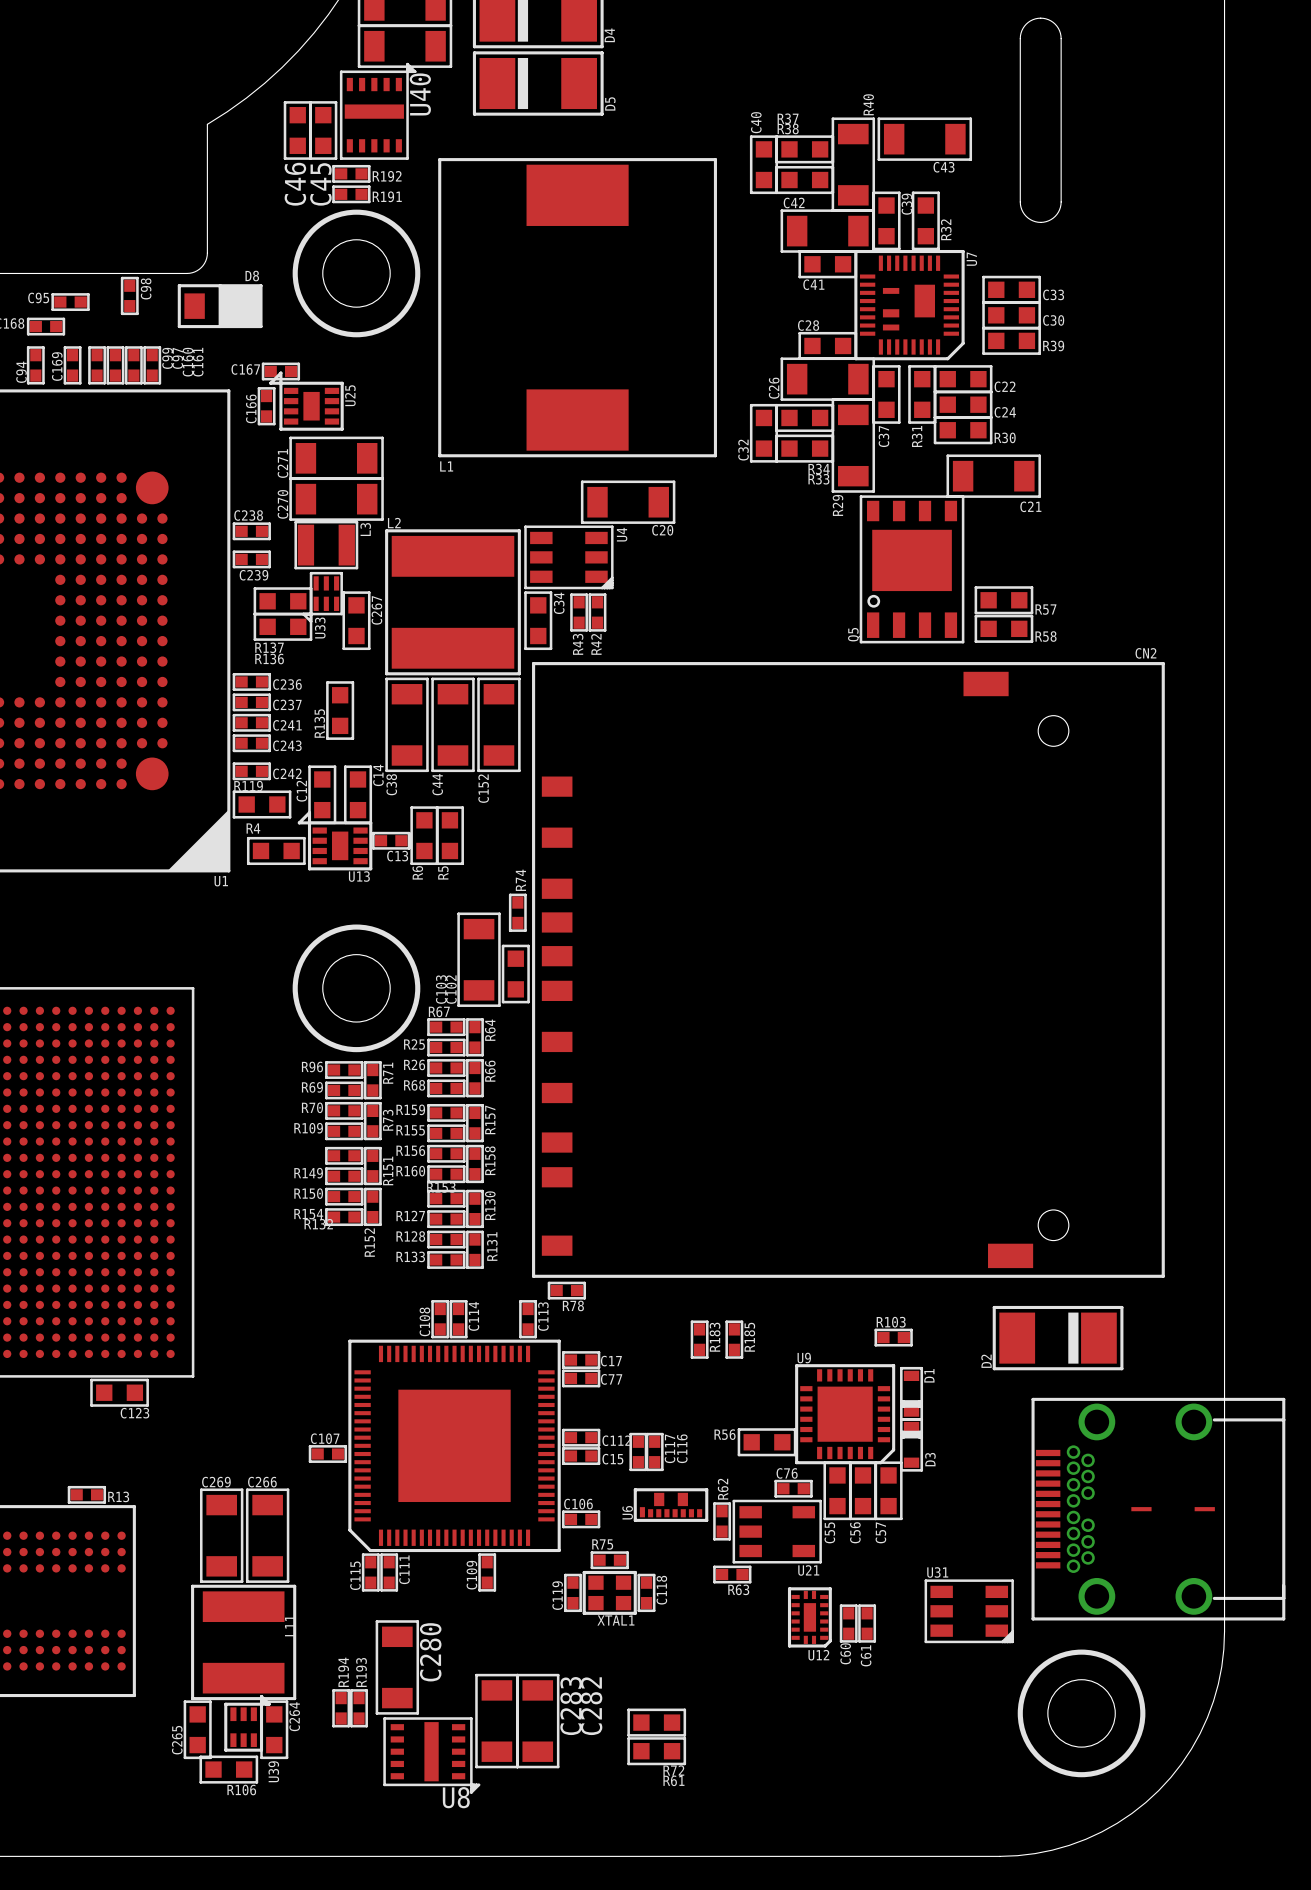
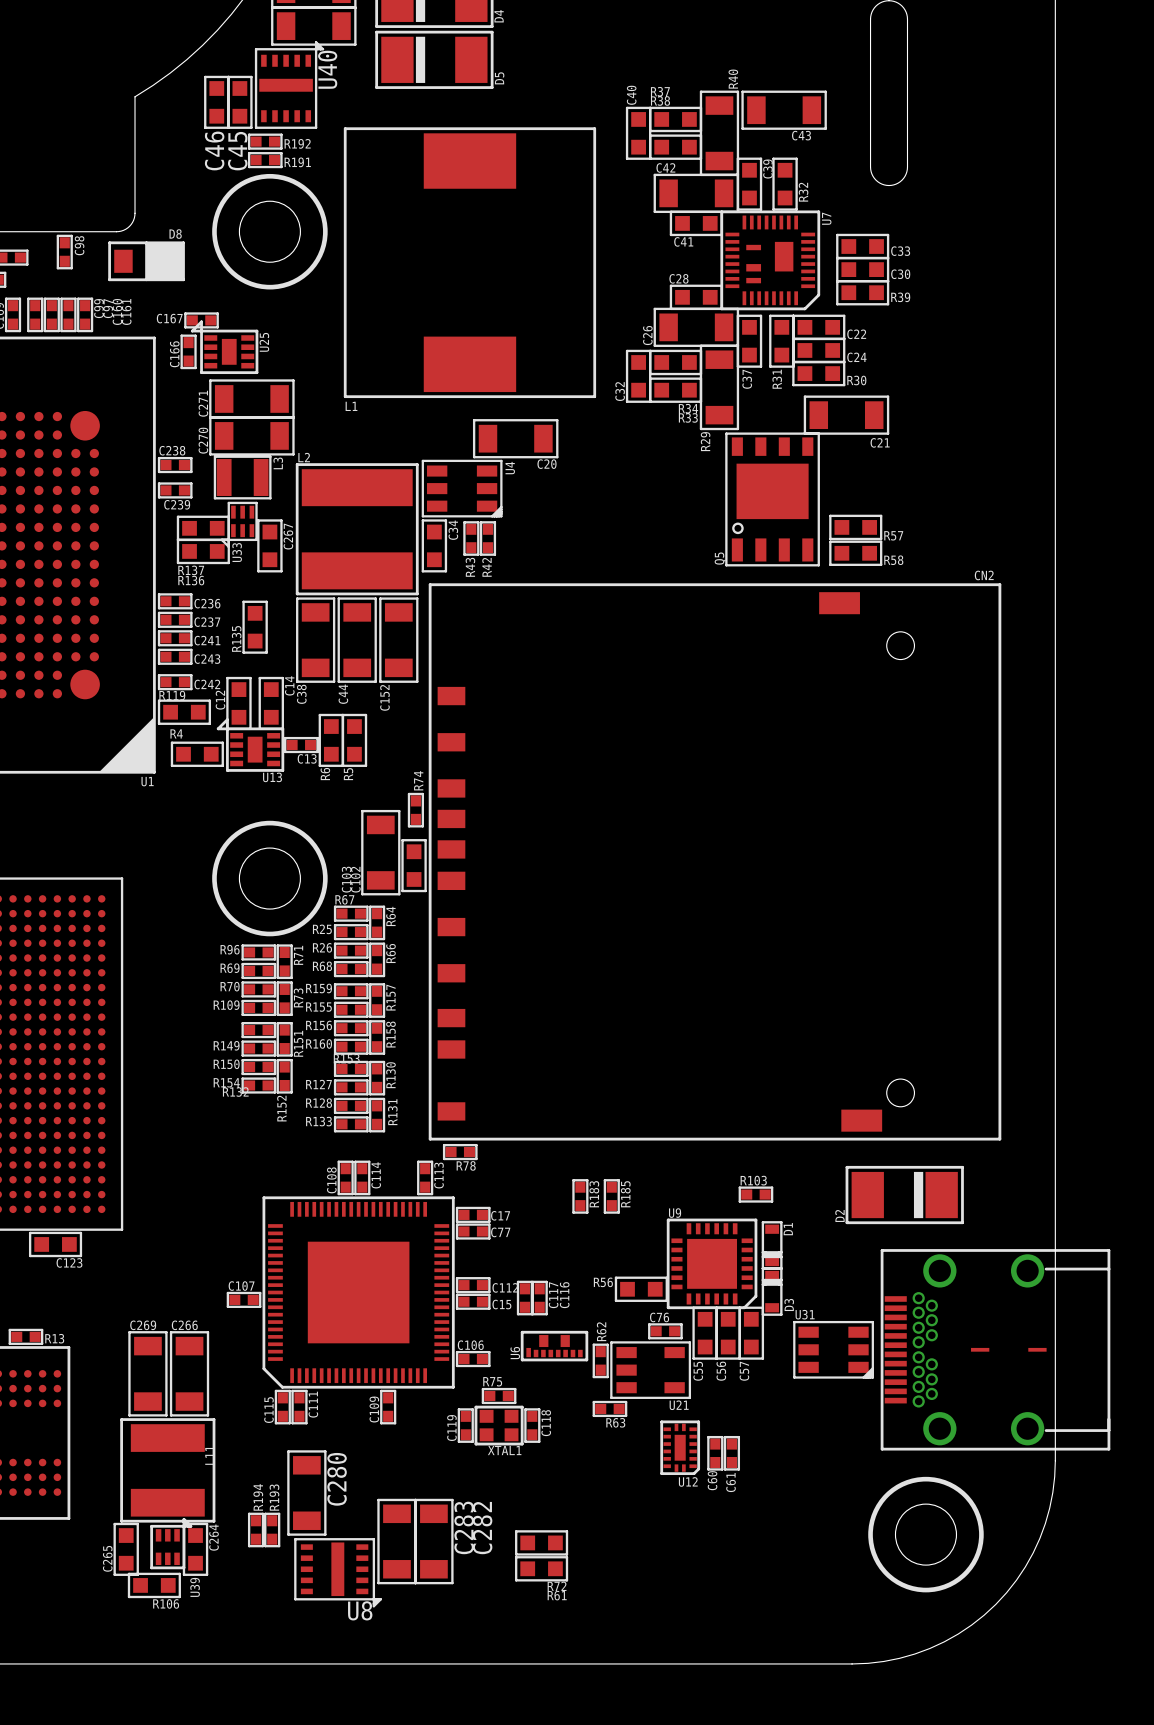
U31 position: (969, 1611) -> (833, 1349)

